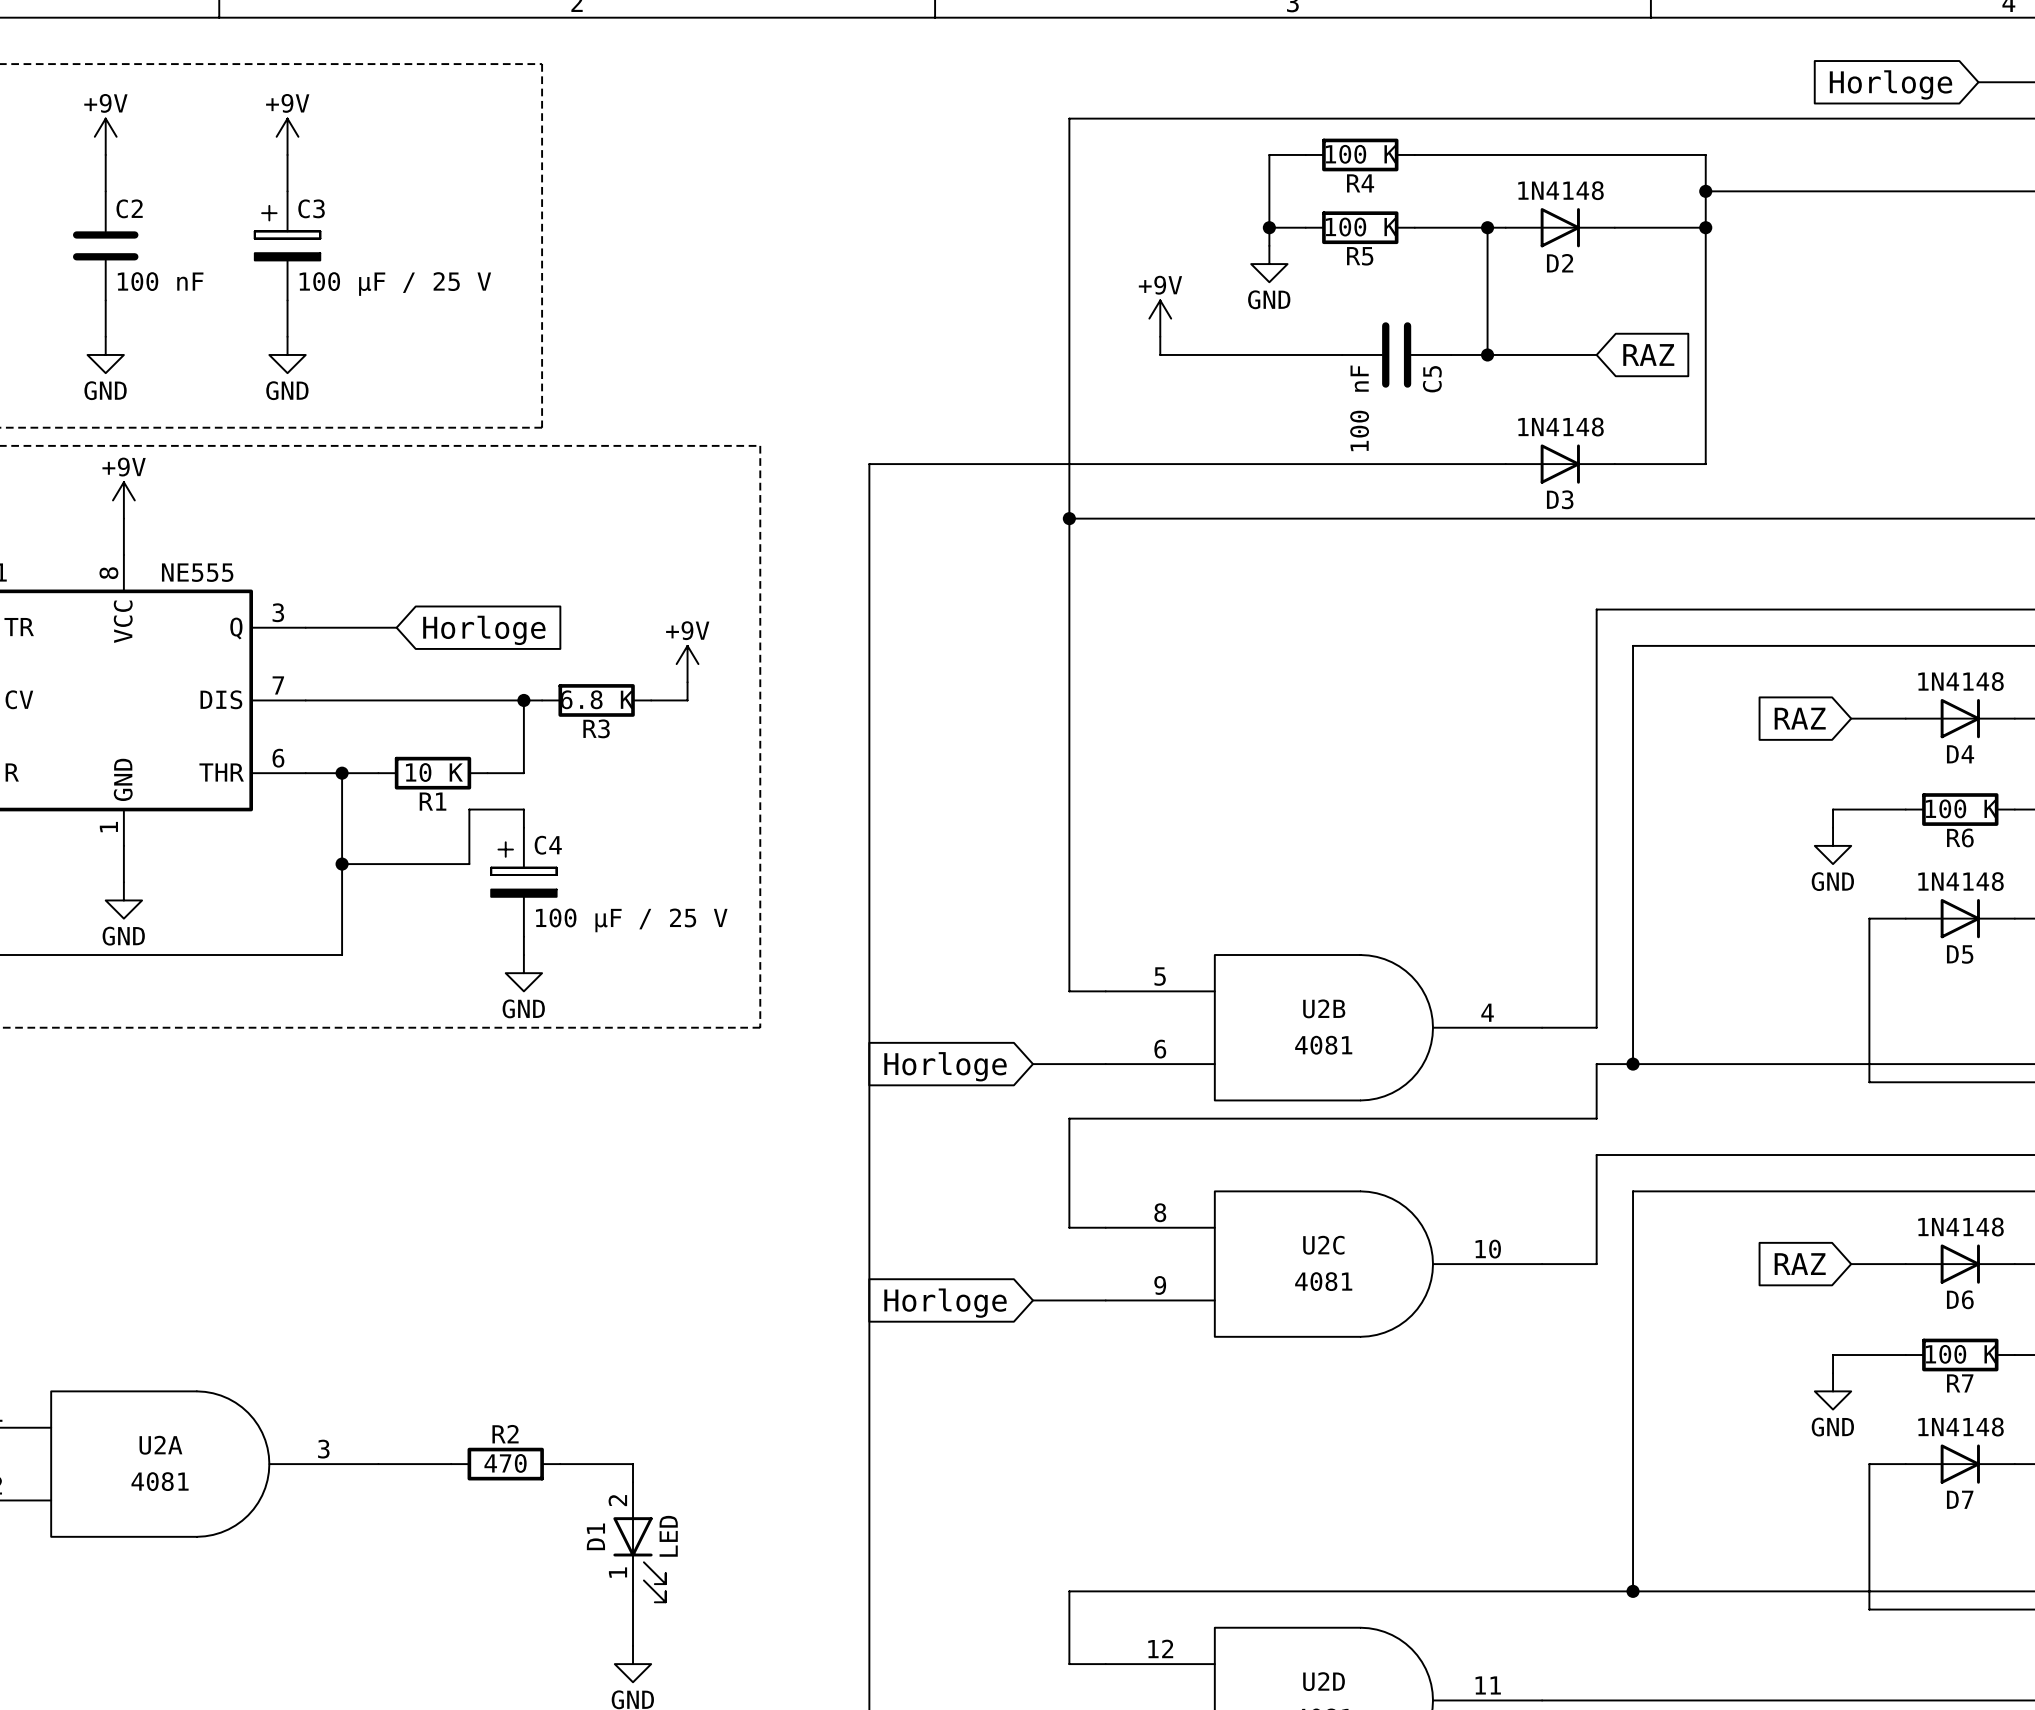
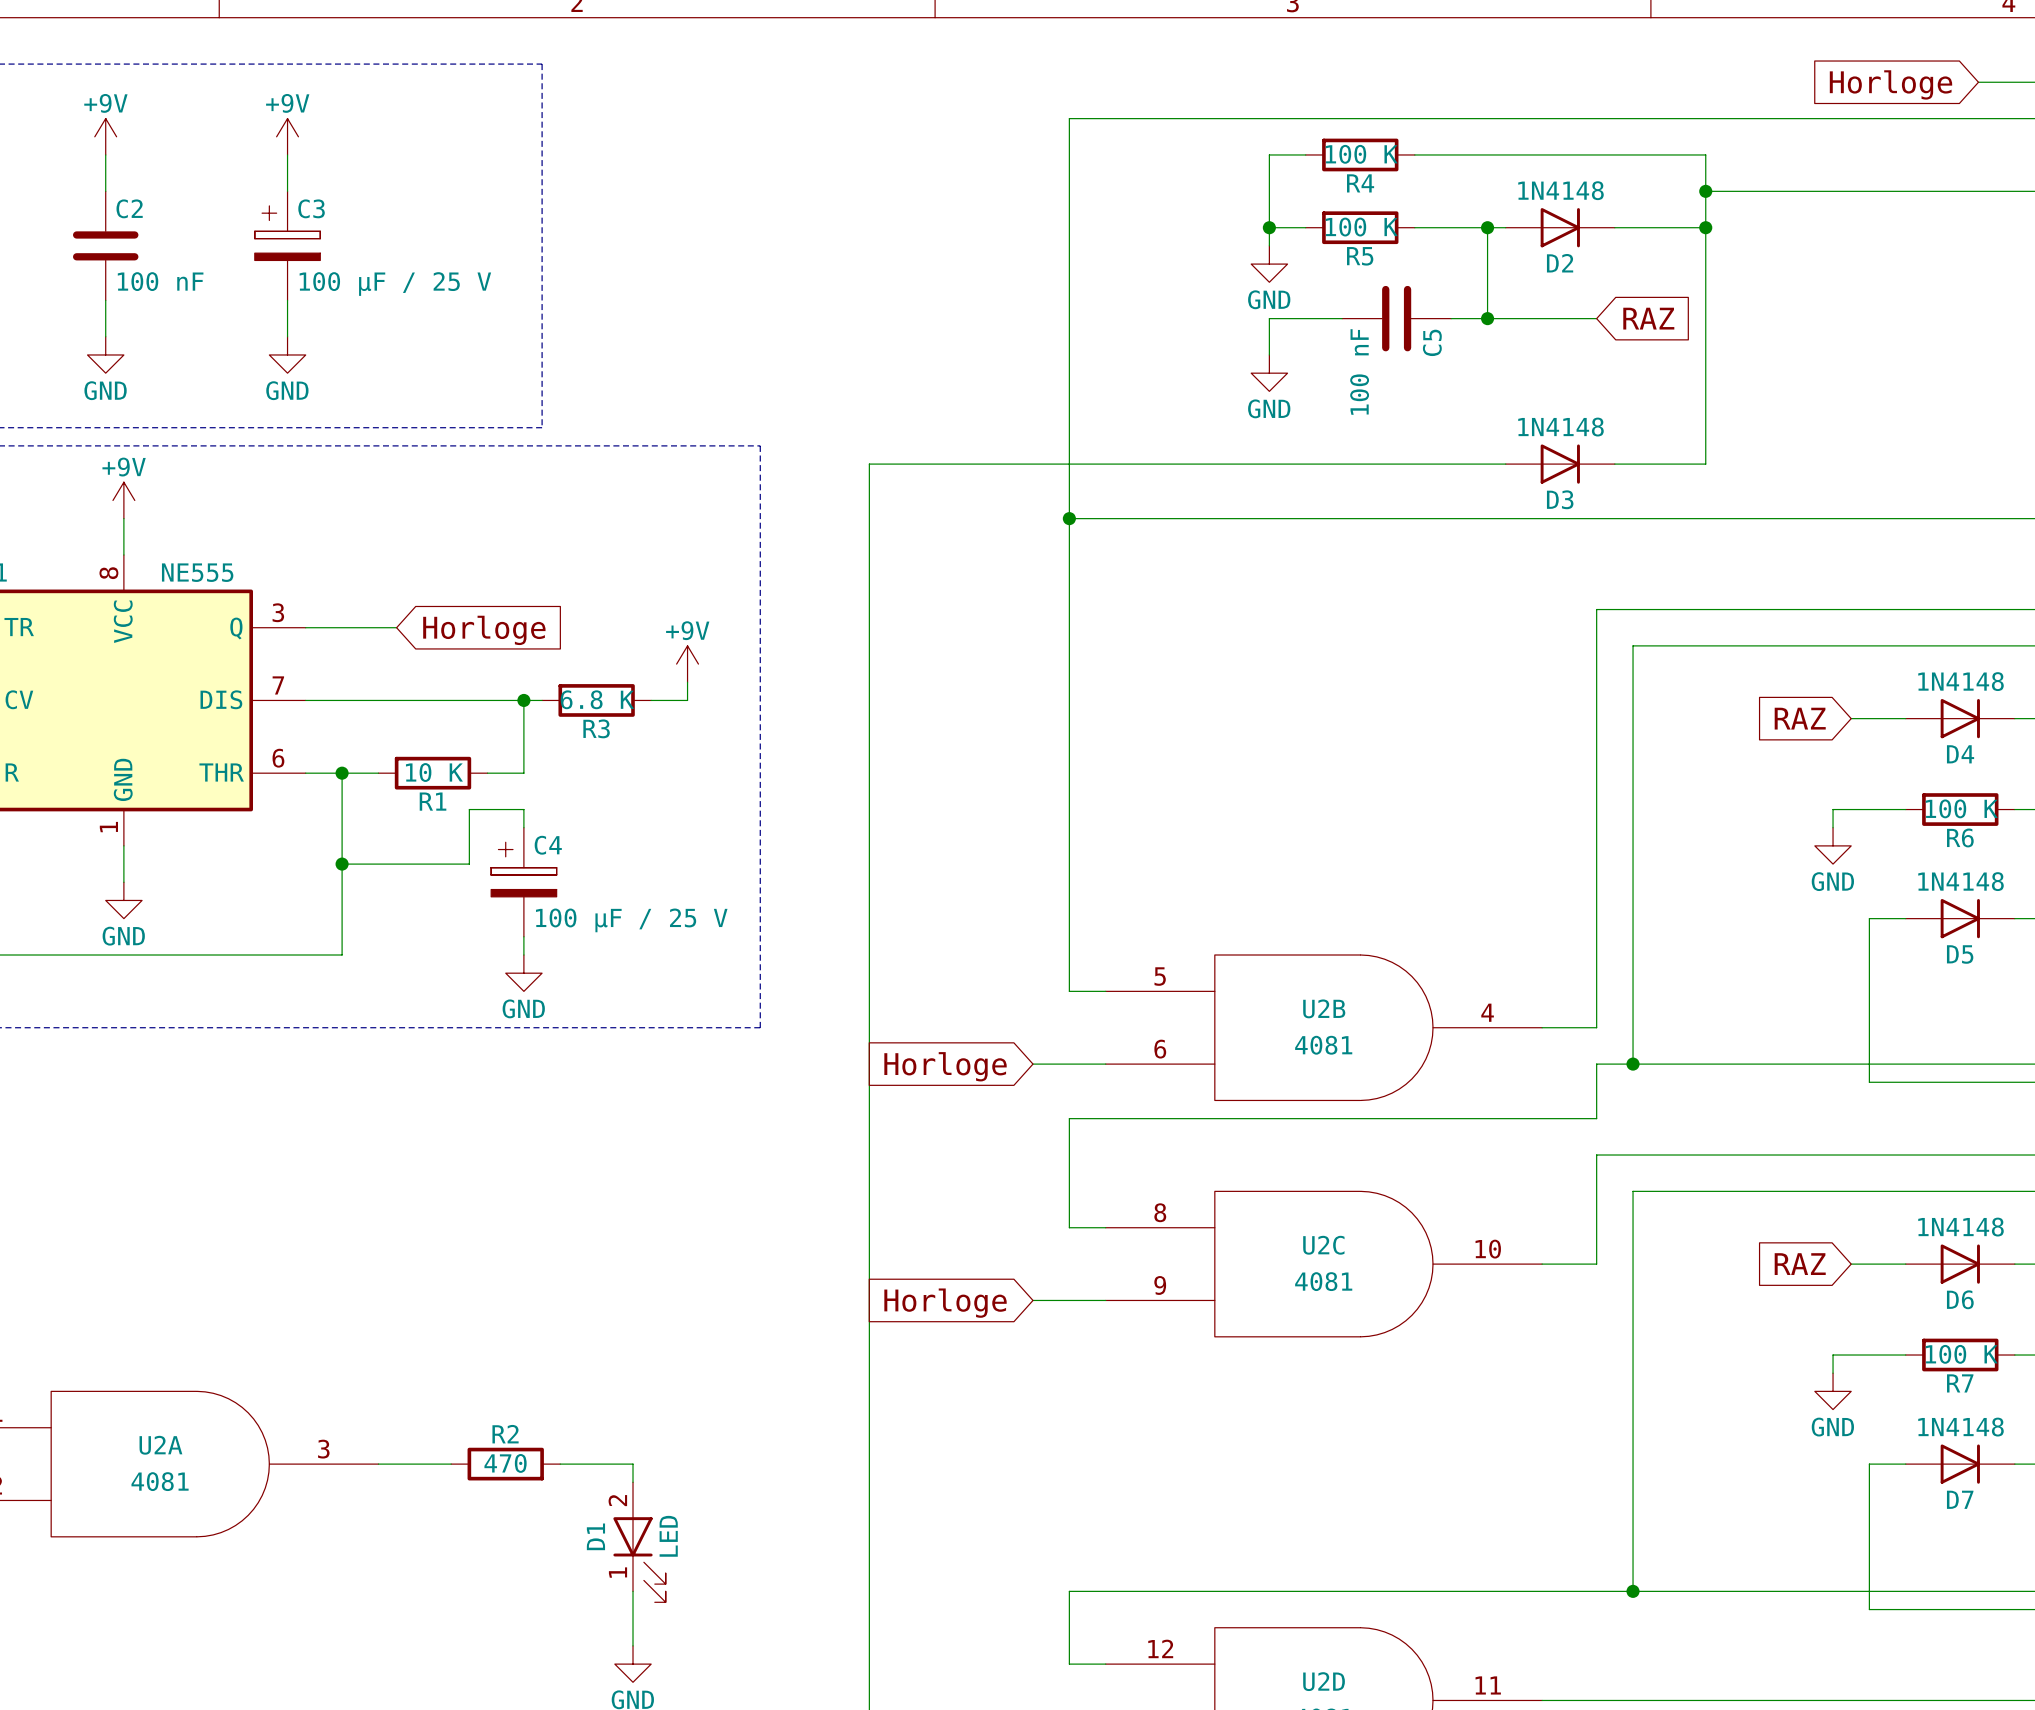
power symbol: +9V (1160, 318) -> none
wire: none -> (1342, 318) (1269, 318) (1269, 354)
wire: (1487, 318) (1487, 354) -> none
wire: (1160, 336) (1160, 354) (1342, 354) -> none
C5 position: (1396, 354) -> (1396, 318)
wire: (1451, 354) (1596, 354) -> (1451, 318) (1596, 318)
junction position: (1487, 354) -> (1487, 318)
global label position: RAZ (1648, 354) -> RAZ (1648, 318)
power symbol: none -> GND (1269, 373)

